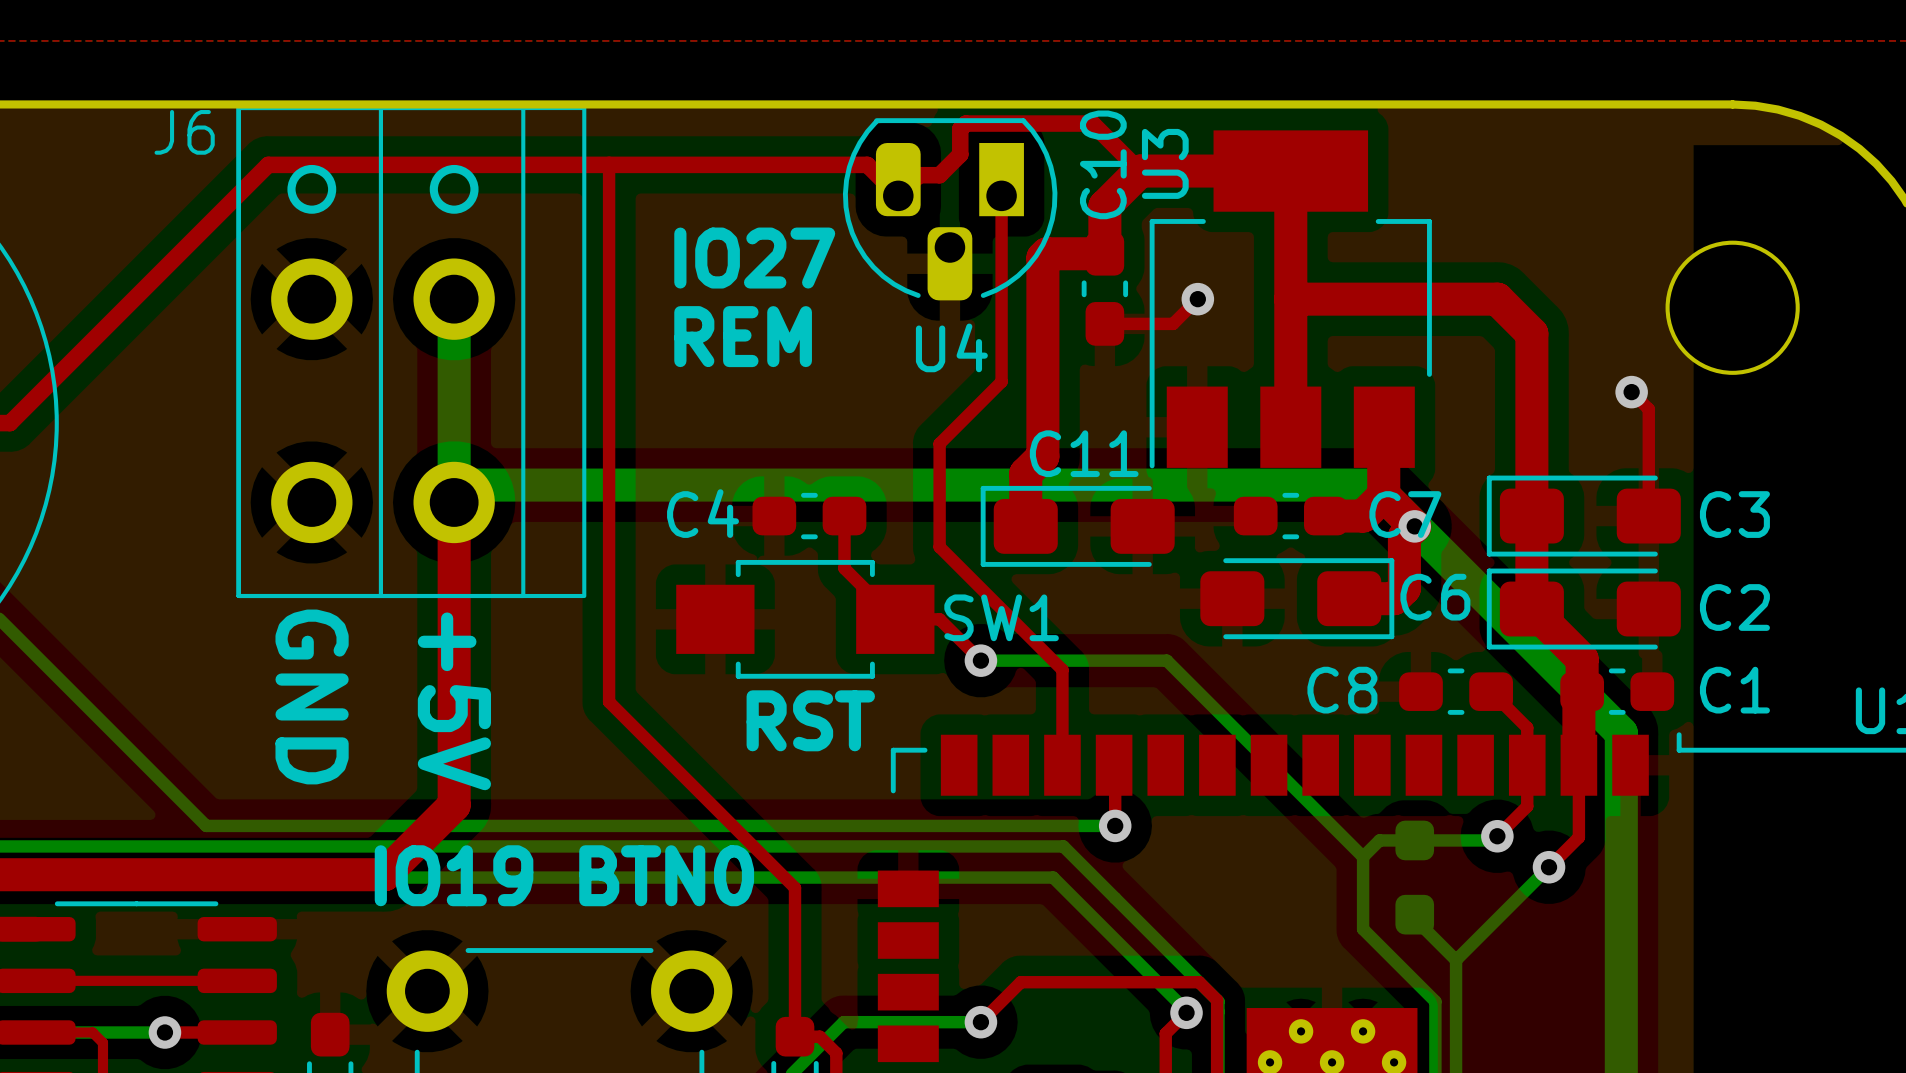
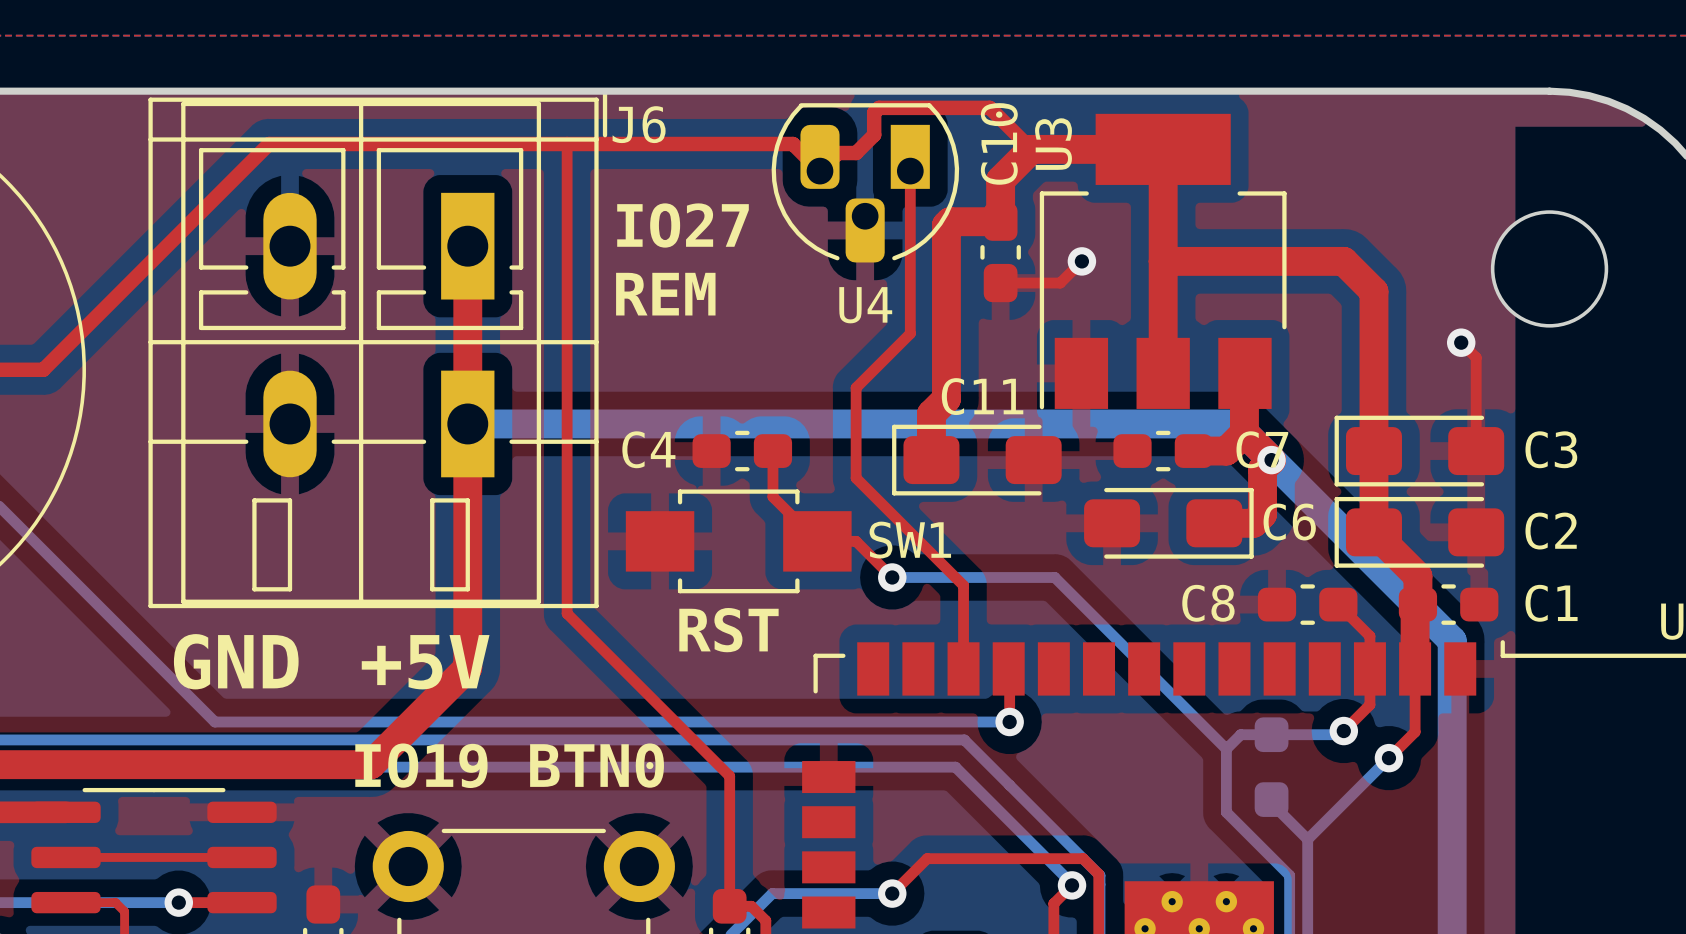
J6 footprint: [236, 105, 587, 599] -> [148, 89, 608, 609]
J6 name position: J6 (184, 132) -> J6 (639, 124)
bottom track: (454, 299) (454, 502) (471, 485) (495, 485) -> none
top track: (454, 502) (454, 805) -> (467, 246) (467, 667) (431, 703)
text rotation: 0° (312, 696) -> 90° counterclockwise (236, 661)
text rotation: 0° (454, 701) -> 90° counterclockwise (425, 662)

